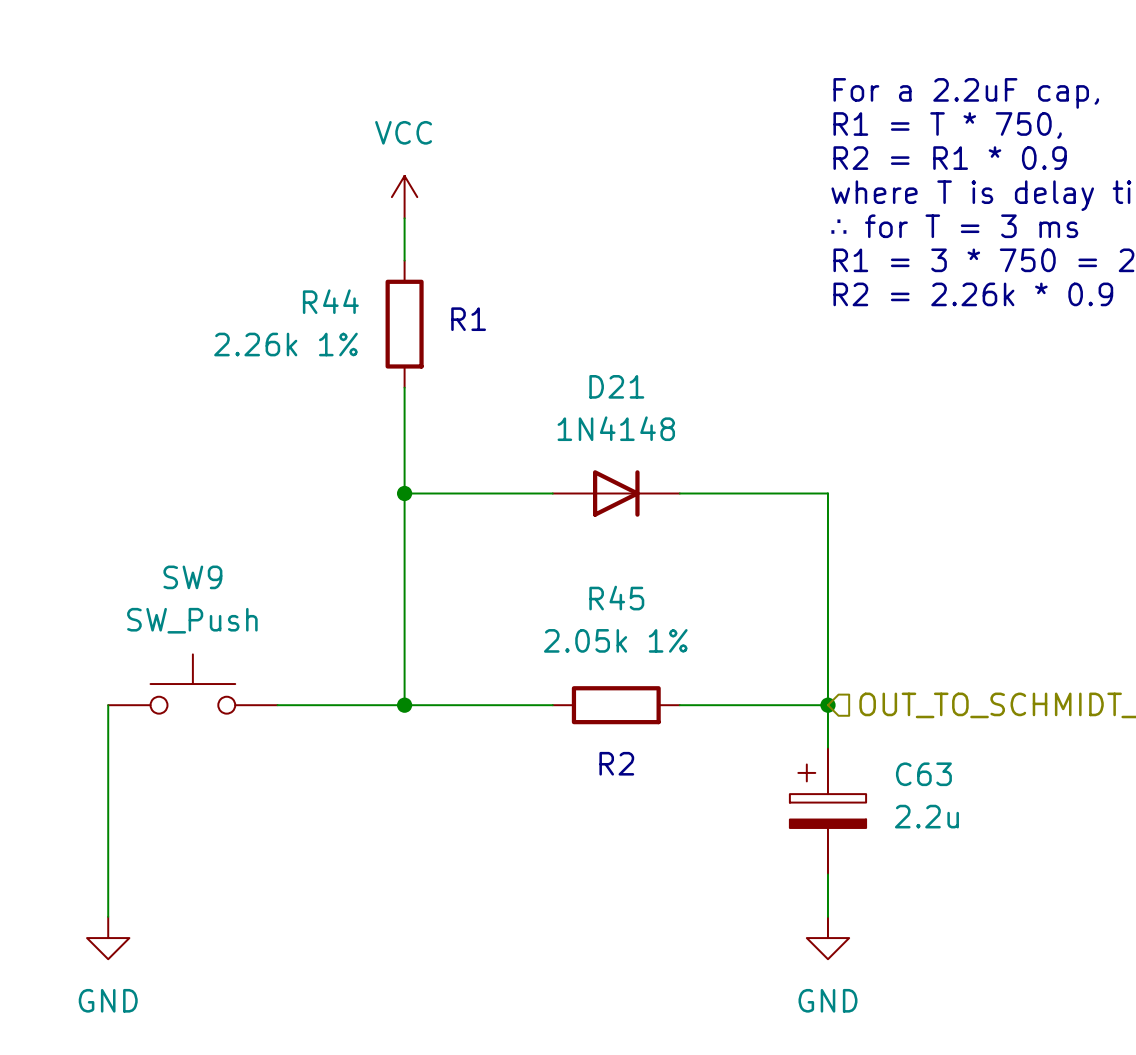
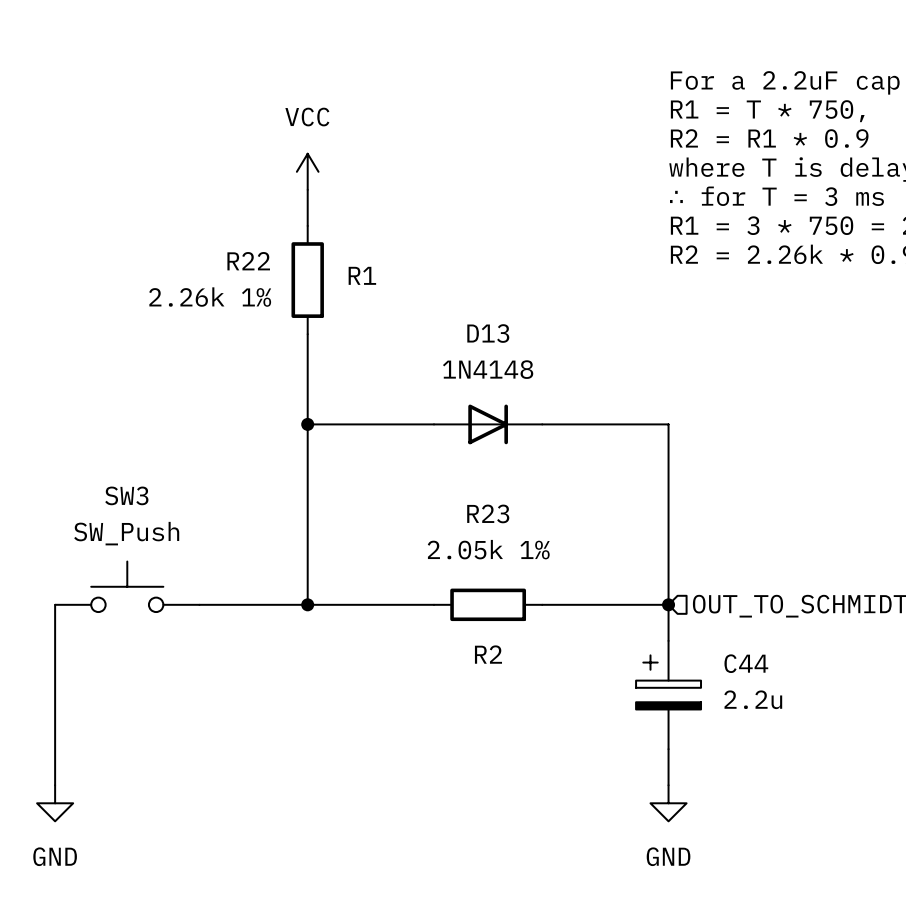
R44 name: R44 (330, 301) -> R22 (248, 261)
D21 name: D21 (616, 386) -> D13 (488, 333)
SW9 name: SW9 (192, 577) -> SW3 (126, 495)
R45 name: R45 (616, 598) -> R23 (488, 513)
C63 name: C63 (923, 774) -> C44 (746, 663)

